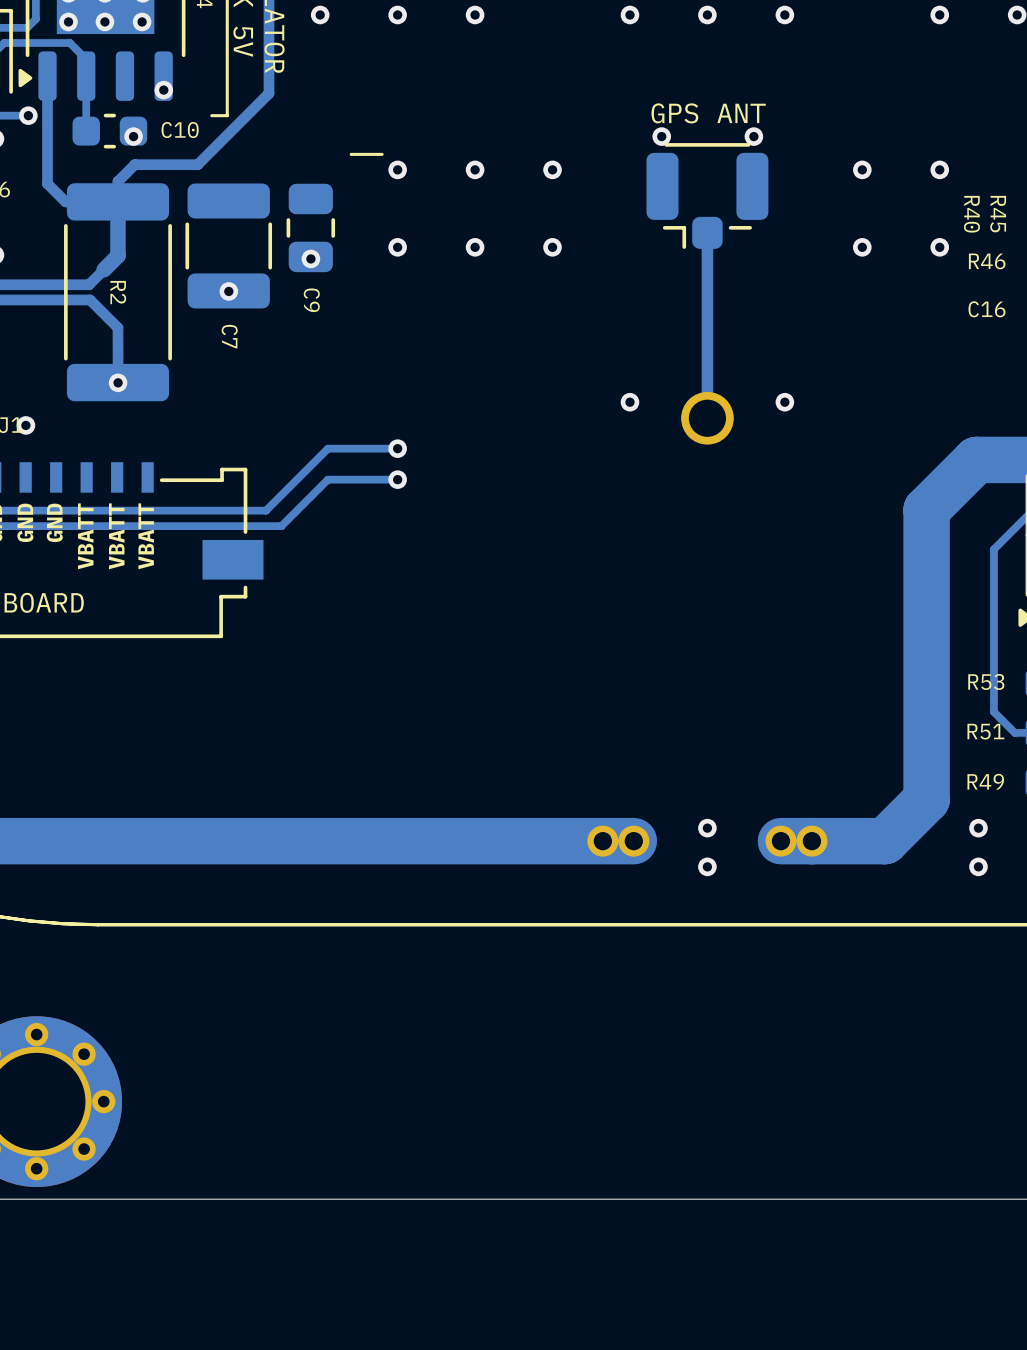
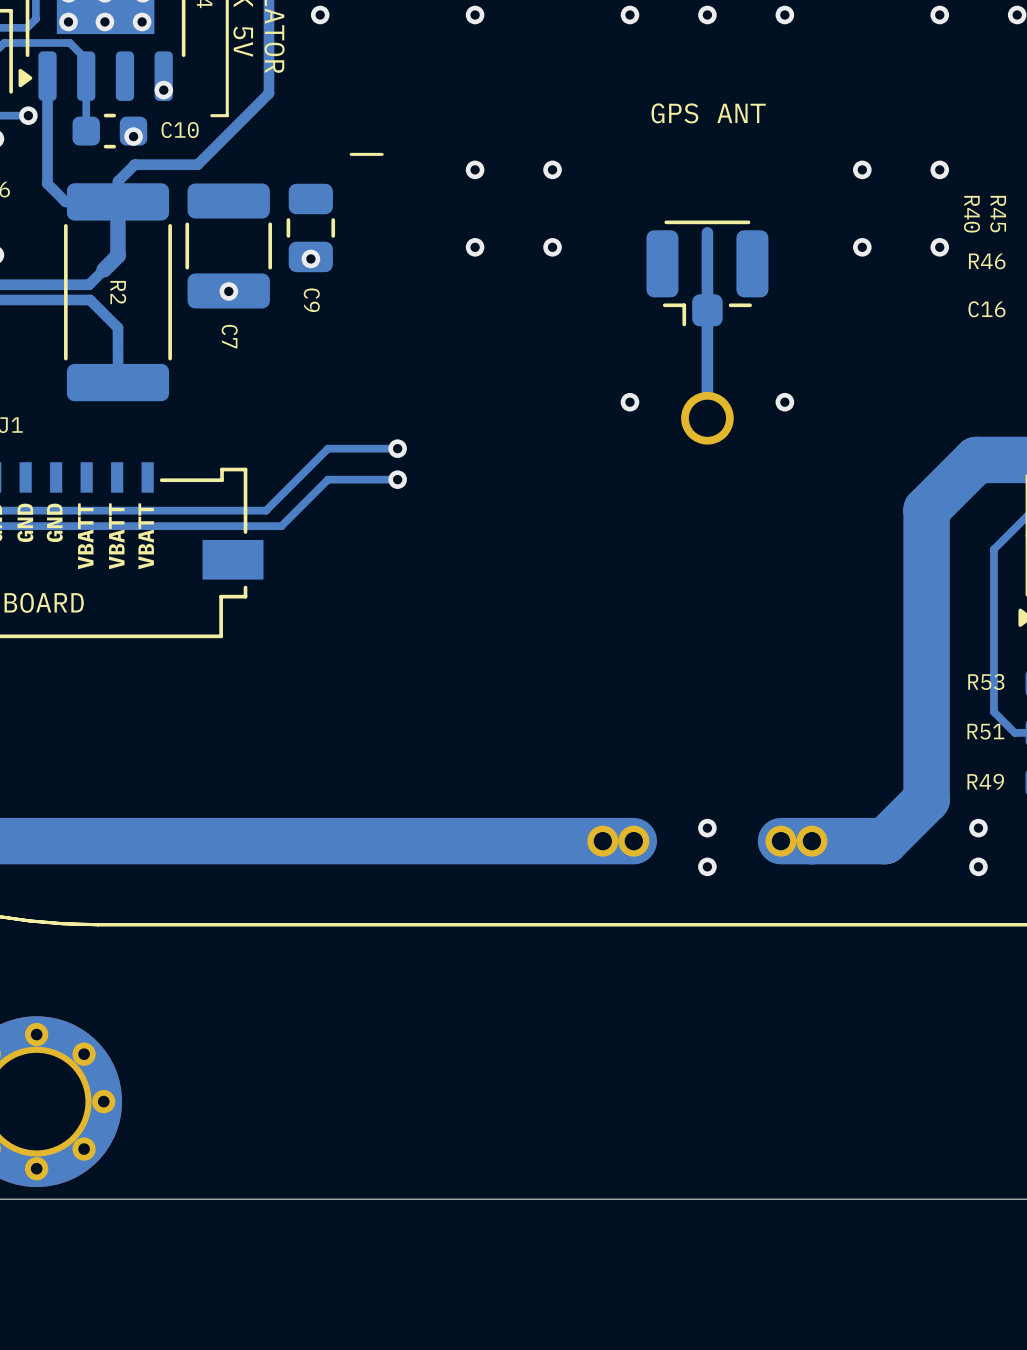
via: (397, 14) -> none
via: (661, 136) -> none
via: (753, 136) -> none
via: (397, 169) -> none
part position: (707, 195) -> (707, 273)
via: (397, 247) -> none
via: (118, 382) -> none
via: (25, 425) -> none

